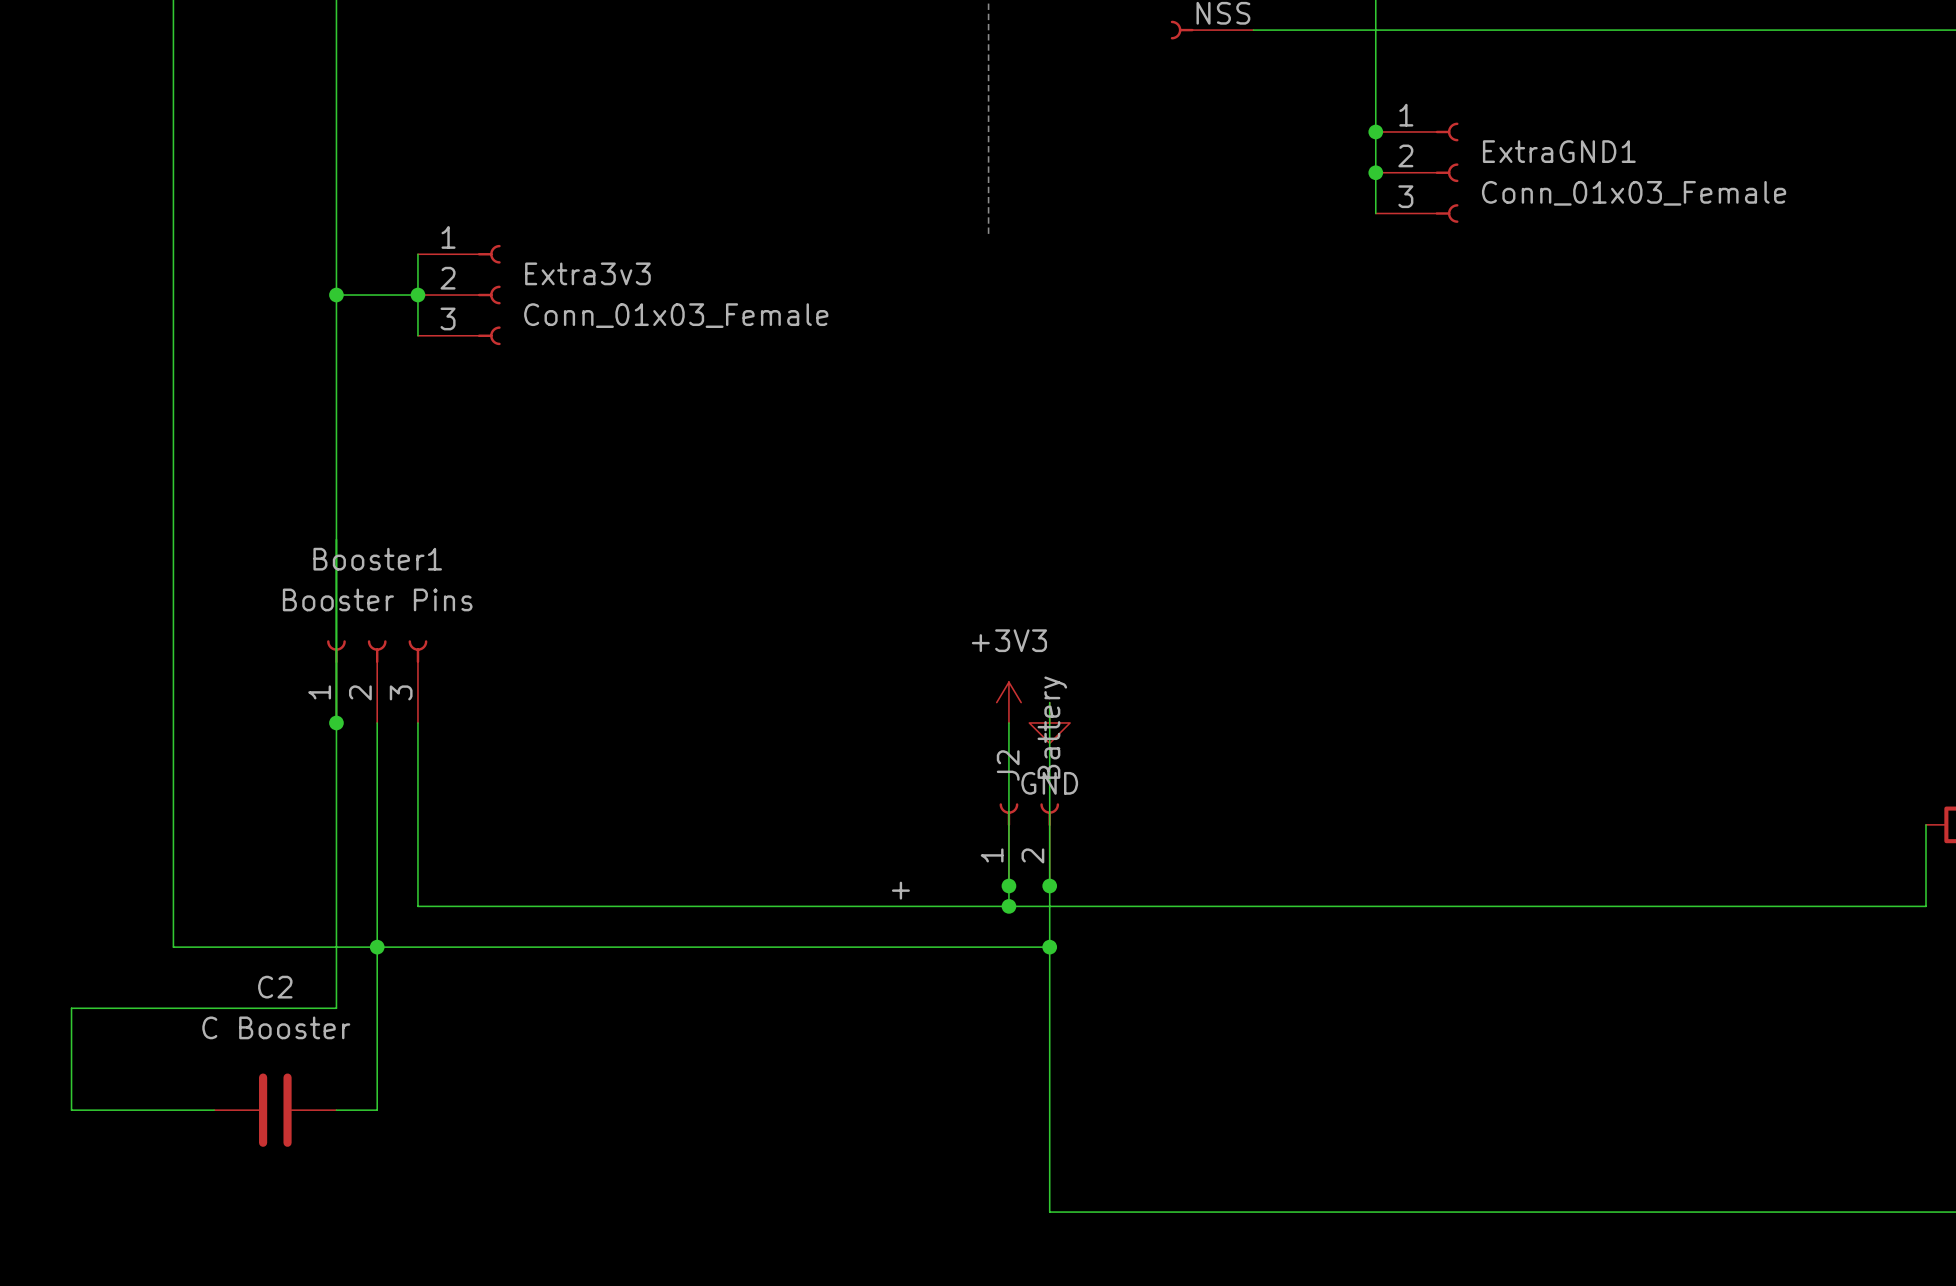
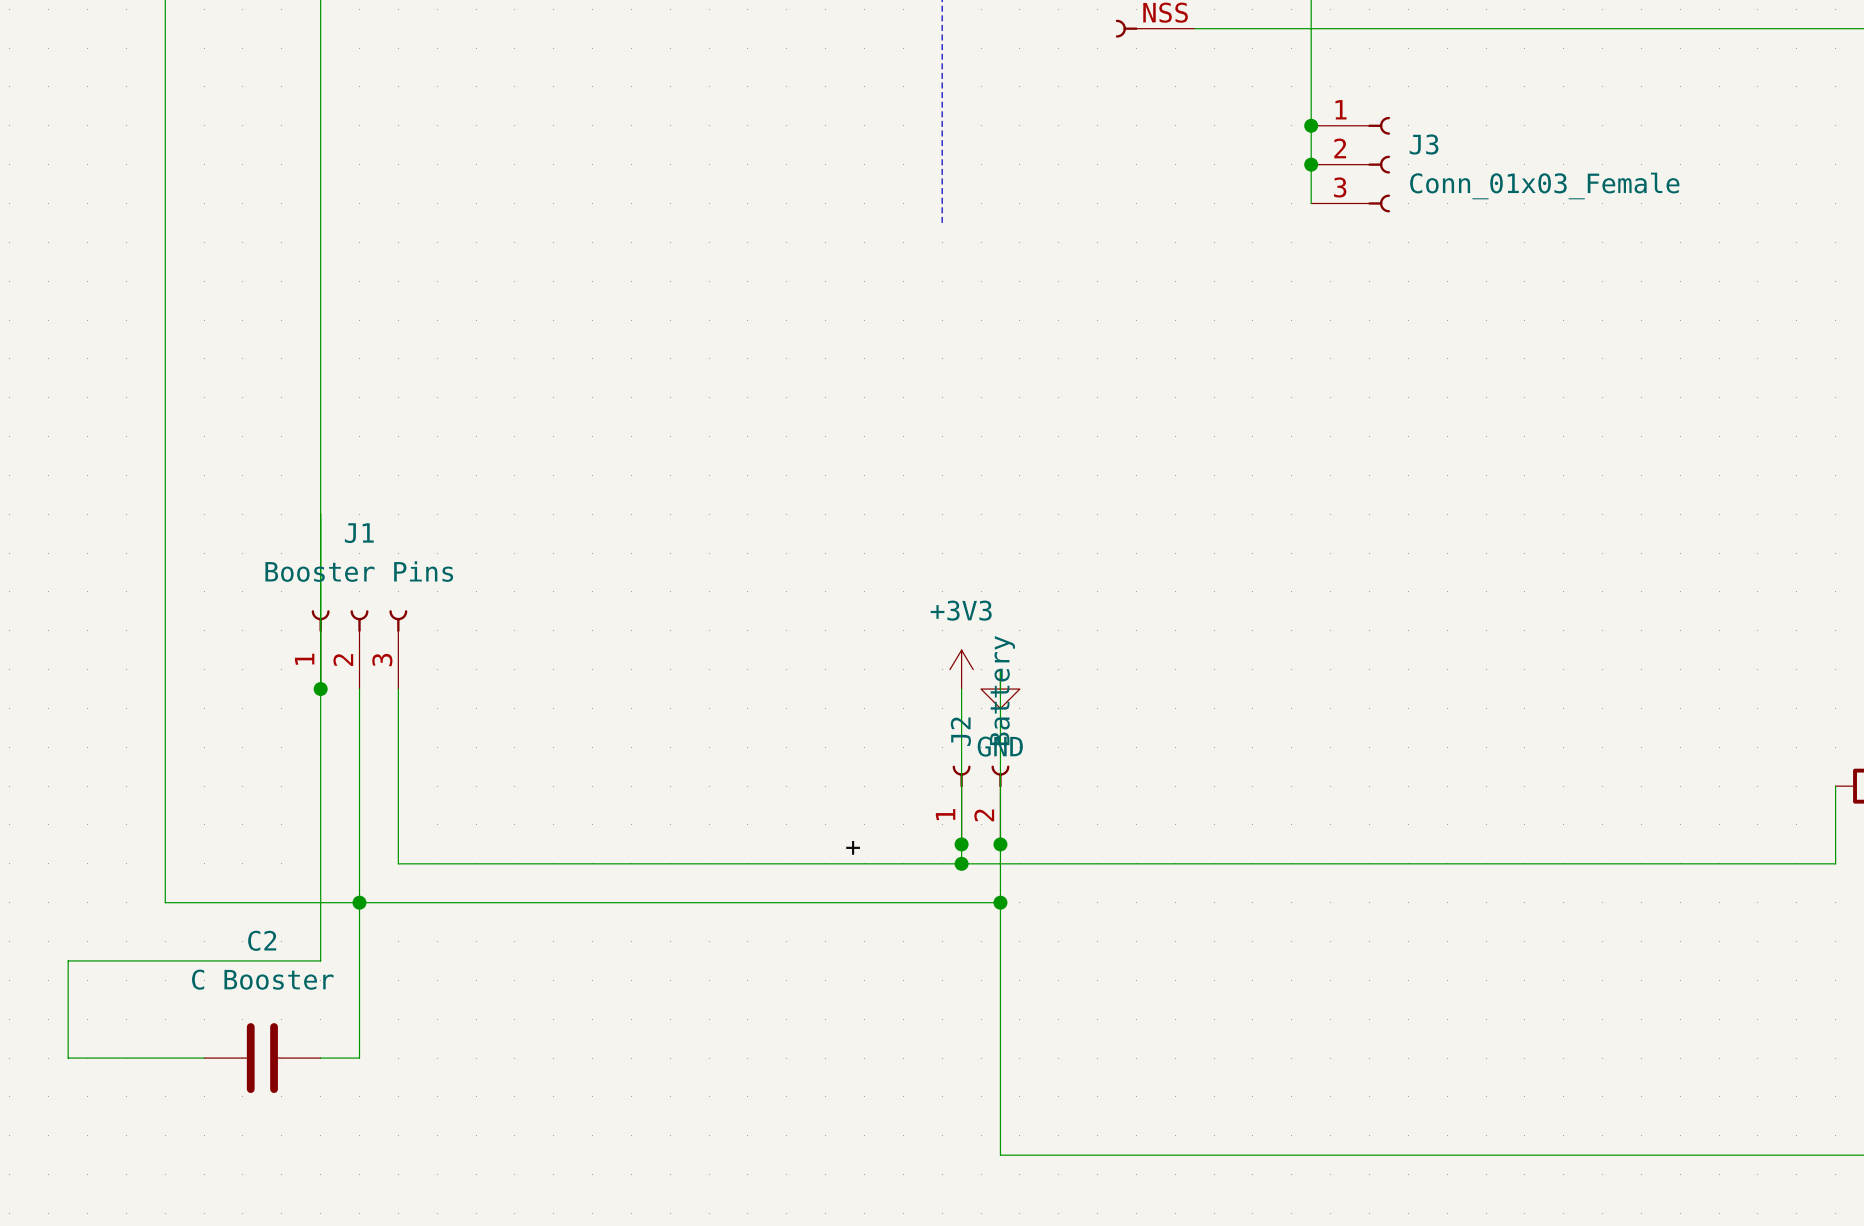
ExtraGND1 name: ExtraGND1 (1559, 151) -> J3 (1424, 144)
wire: (417, 254) (417, 335) -> none
wire: (336, 295) (417, 295) -> none
junction: (336, 295) -> none
junction: (417, 295) -> none
Extra3v3: Conn_01x03_Female (459, 295) -> none
Booster1 name: Booster1 (377, 559) -> J1 (359, 533)

